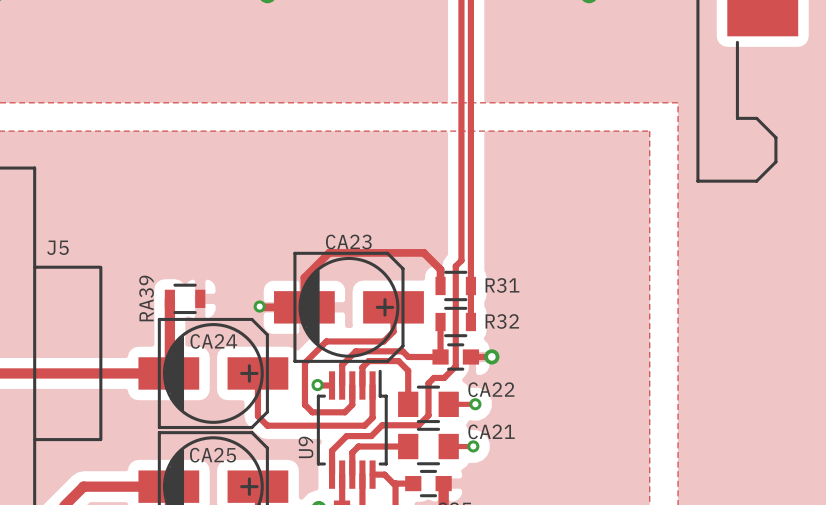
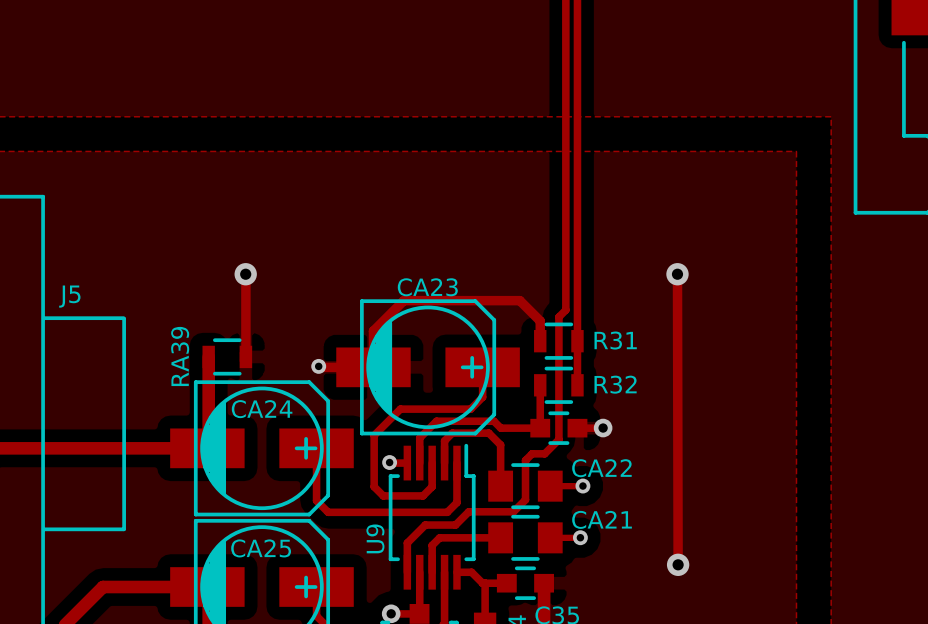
track: none -> (245, 274) (245, 356)
via: none -> (245, 274)
track: none -> (677, 274) (678, 564)
via: none -> (677, 274)
via: none -> (678, 564)

